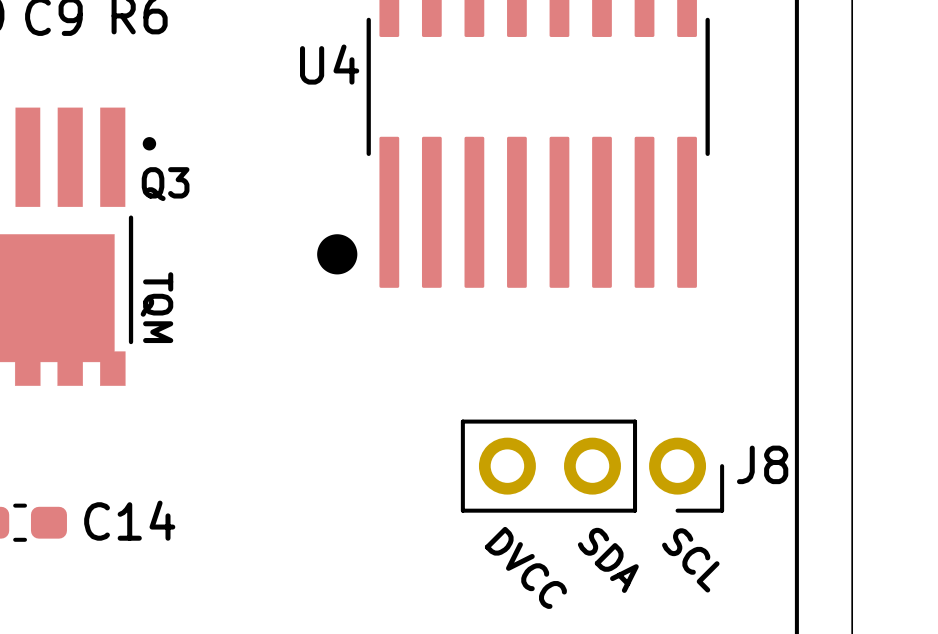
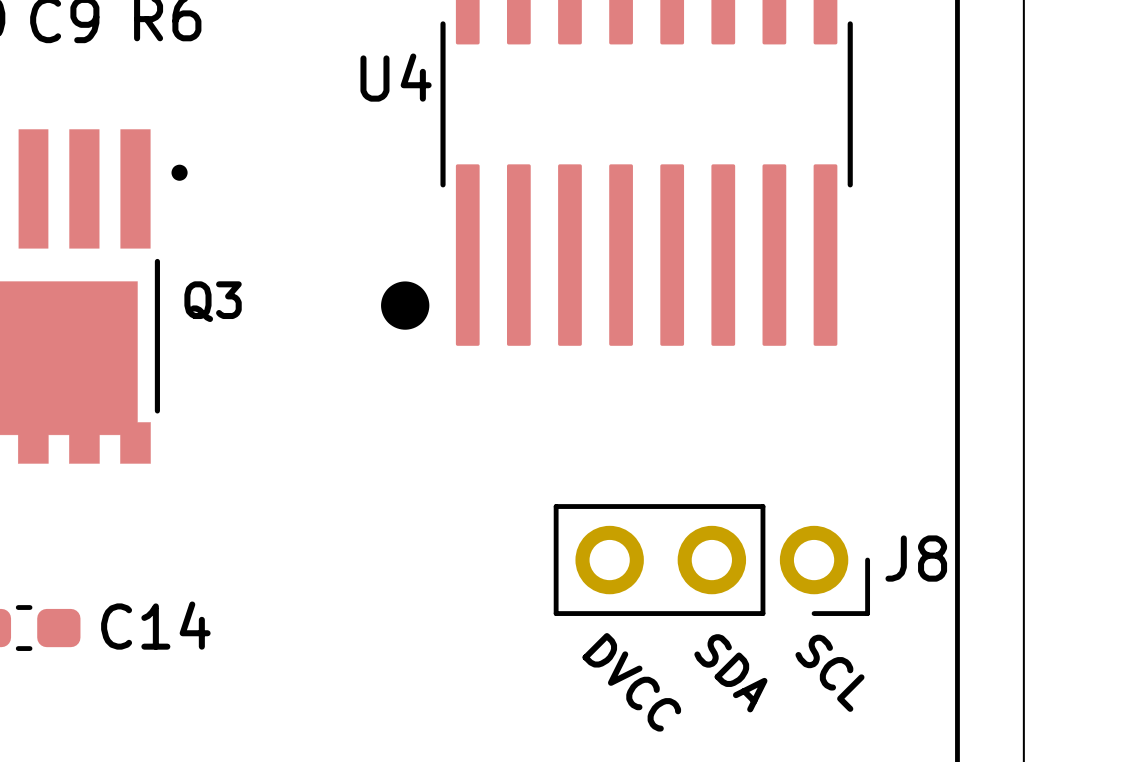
Q3 name position: Q3 (165, 184) -> Q3 (213, 301)
text: TQM (156, 307) -> none

